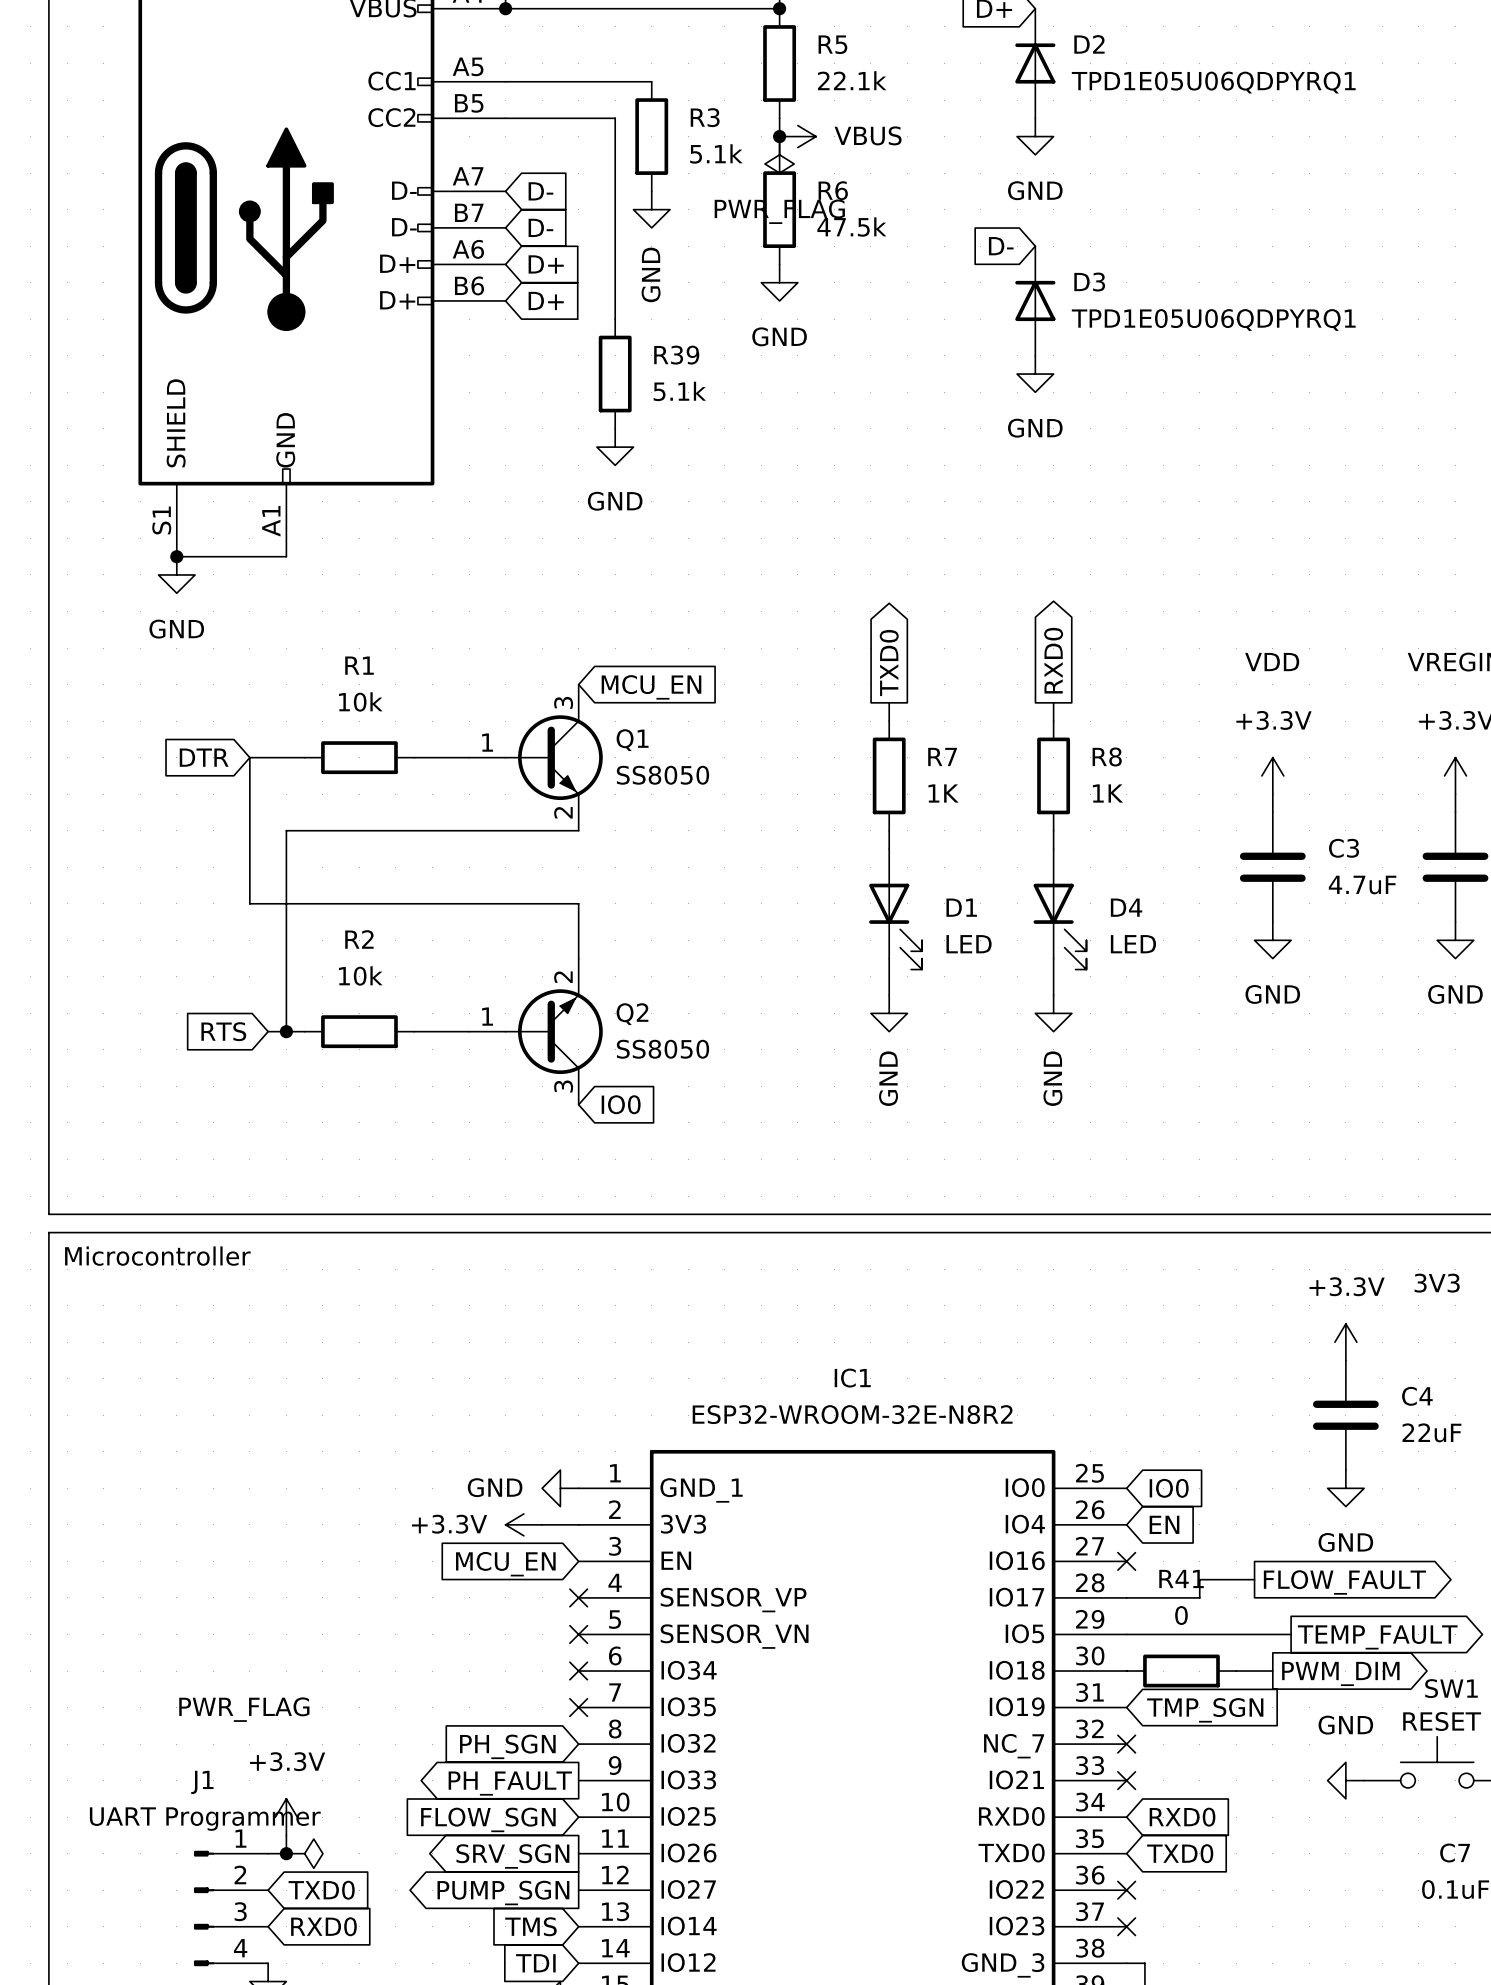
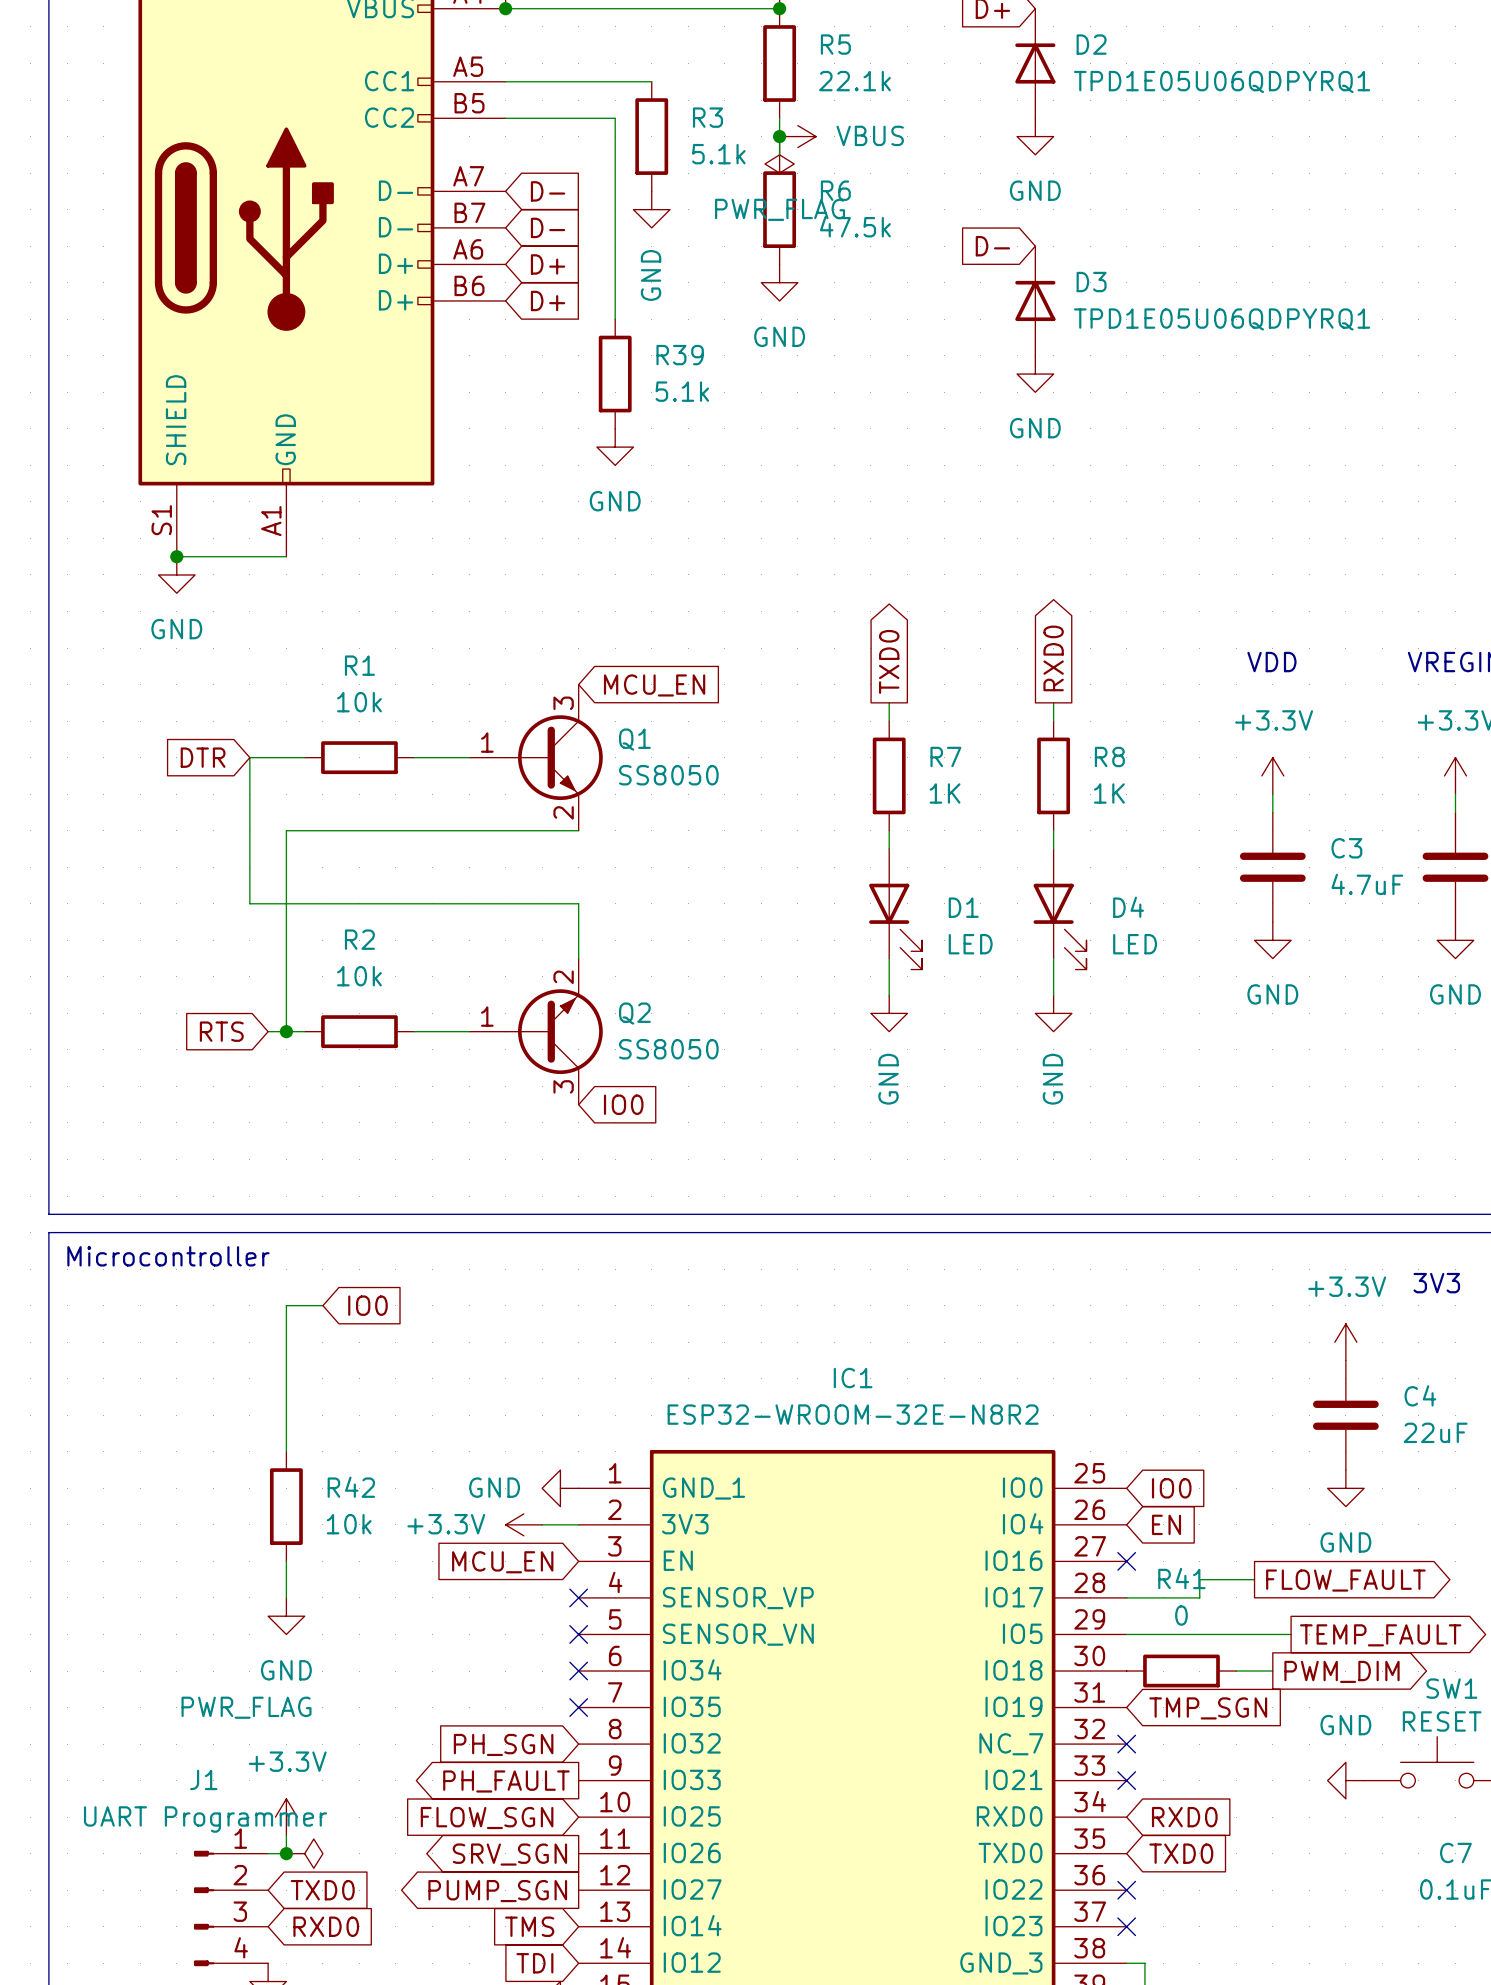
wire: none -> (322, 1305) (286, 1305) (286, 1451)
global label: none -> IO0 (367, 1305)
R42: none -> 10k (286, 1506)
wire: none -> (286, 1561) (286, 1597)
power symbol: none -> GND (286, 1616)

